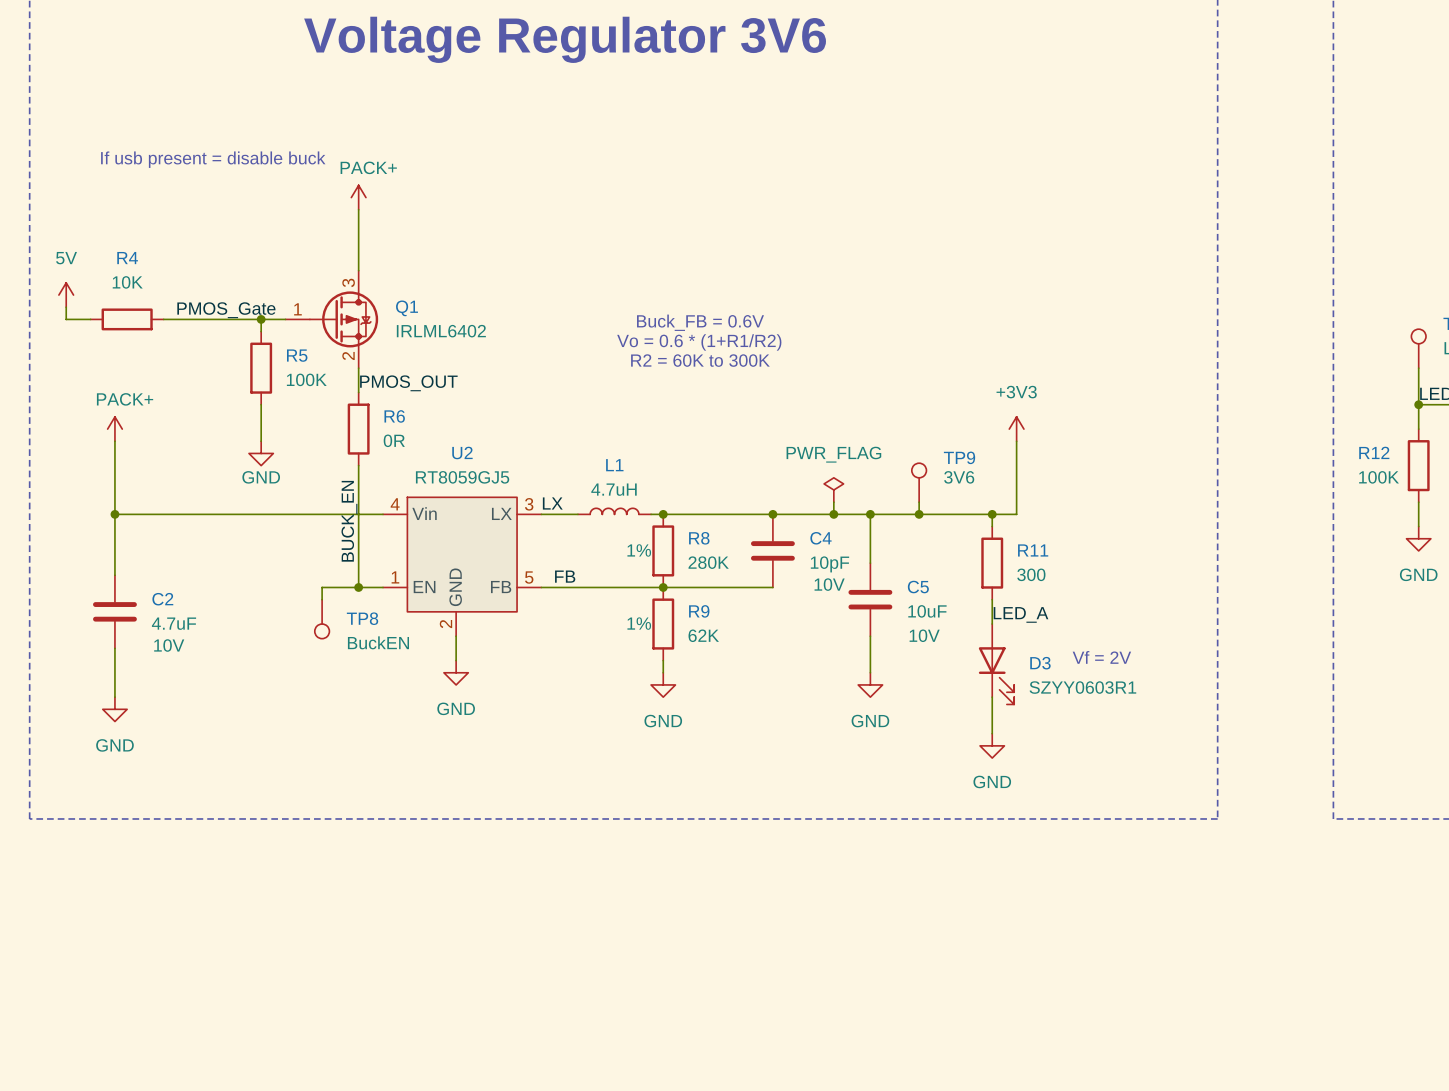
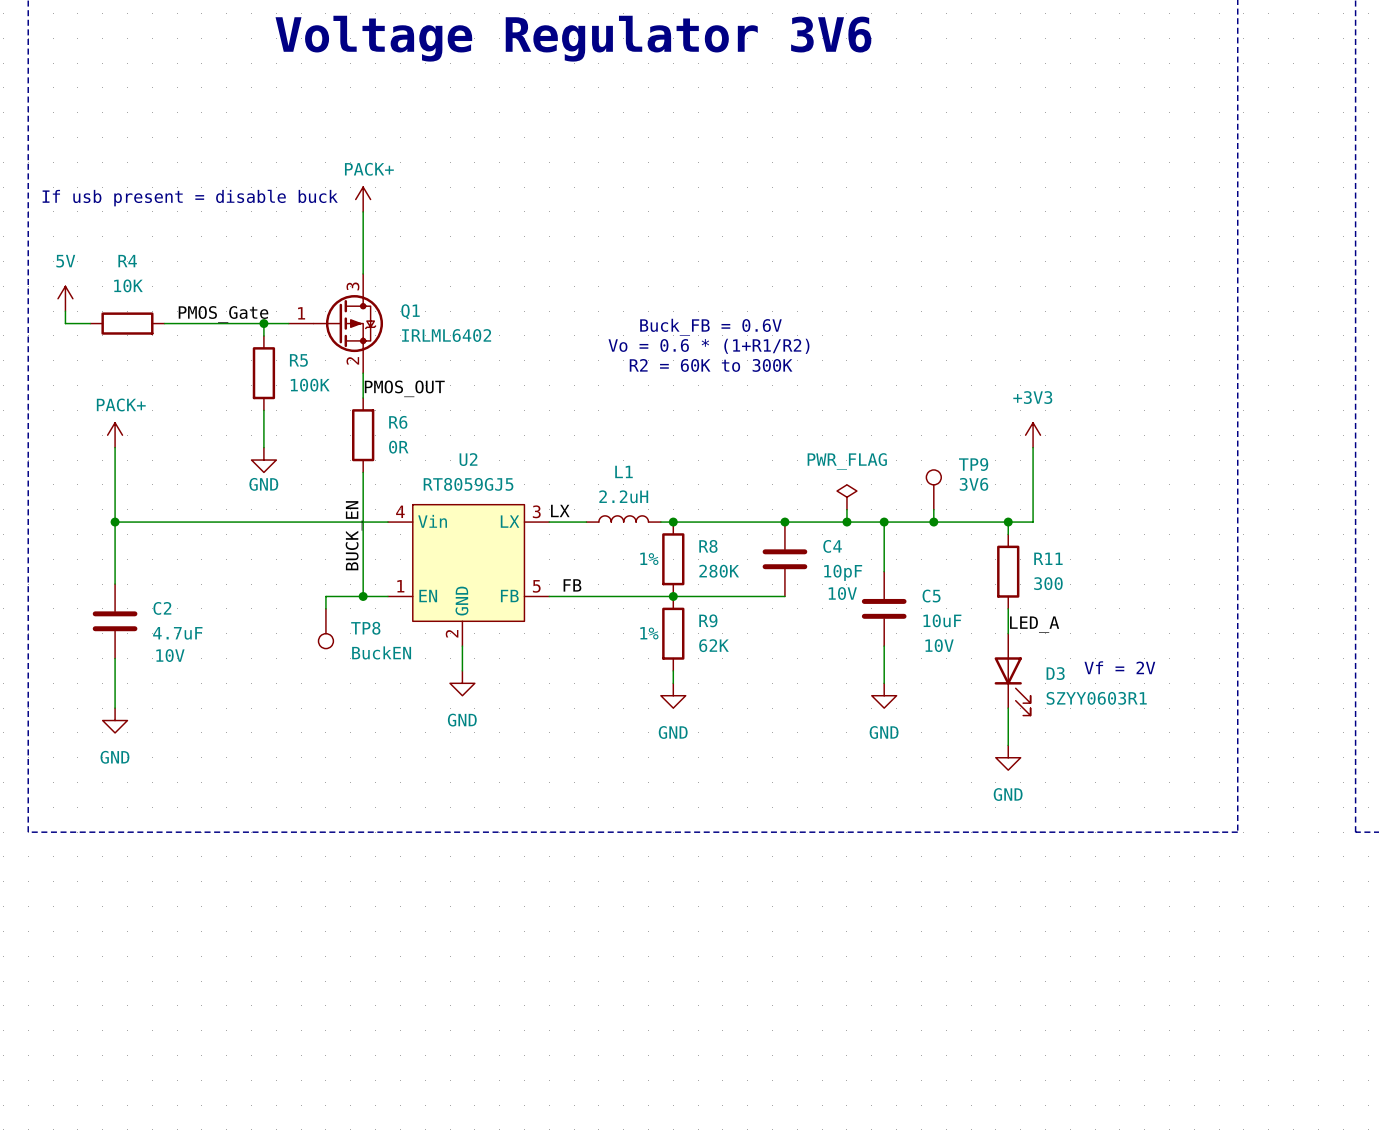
text position: If usb present = disable buck (213, 159) -> If usb present = disable buck (190, 198)
L1 value: 4.7uH (614, 489) -> 2.2uH (623, 496)

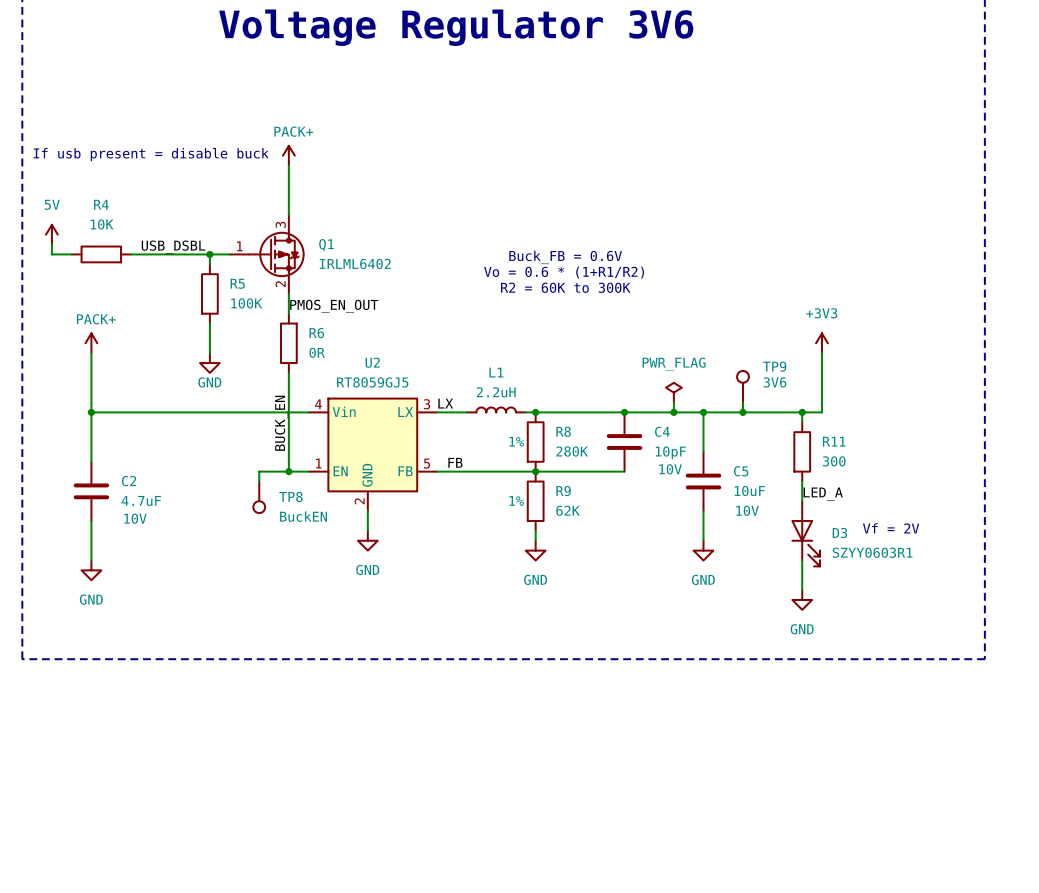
label: PMOS_Gate (223, 314) -> USB_DSBL (173, 247)
label: PMOS_OUT (404, 388) -> PMOS_EN_OUT (334, 306)

